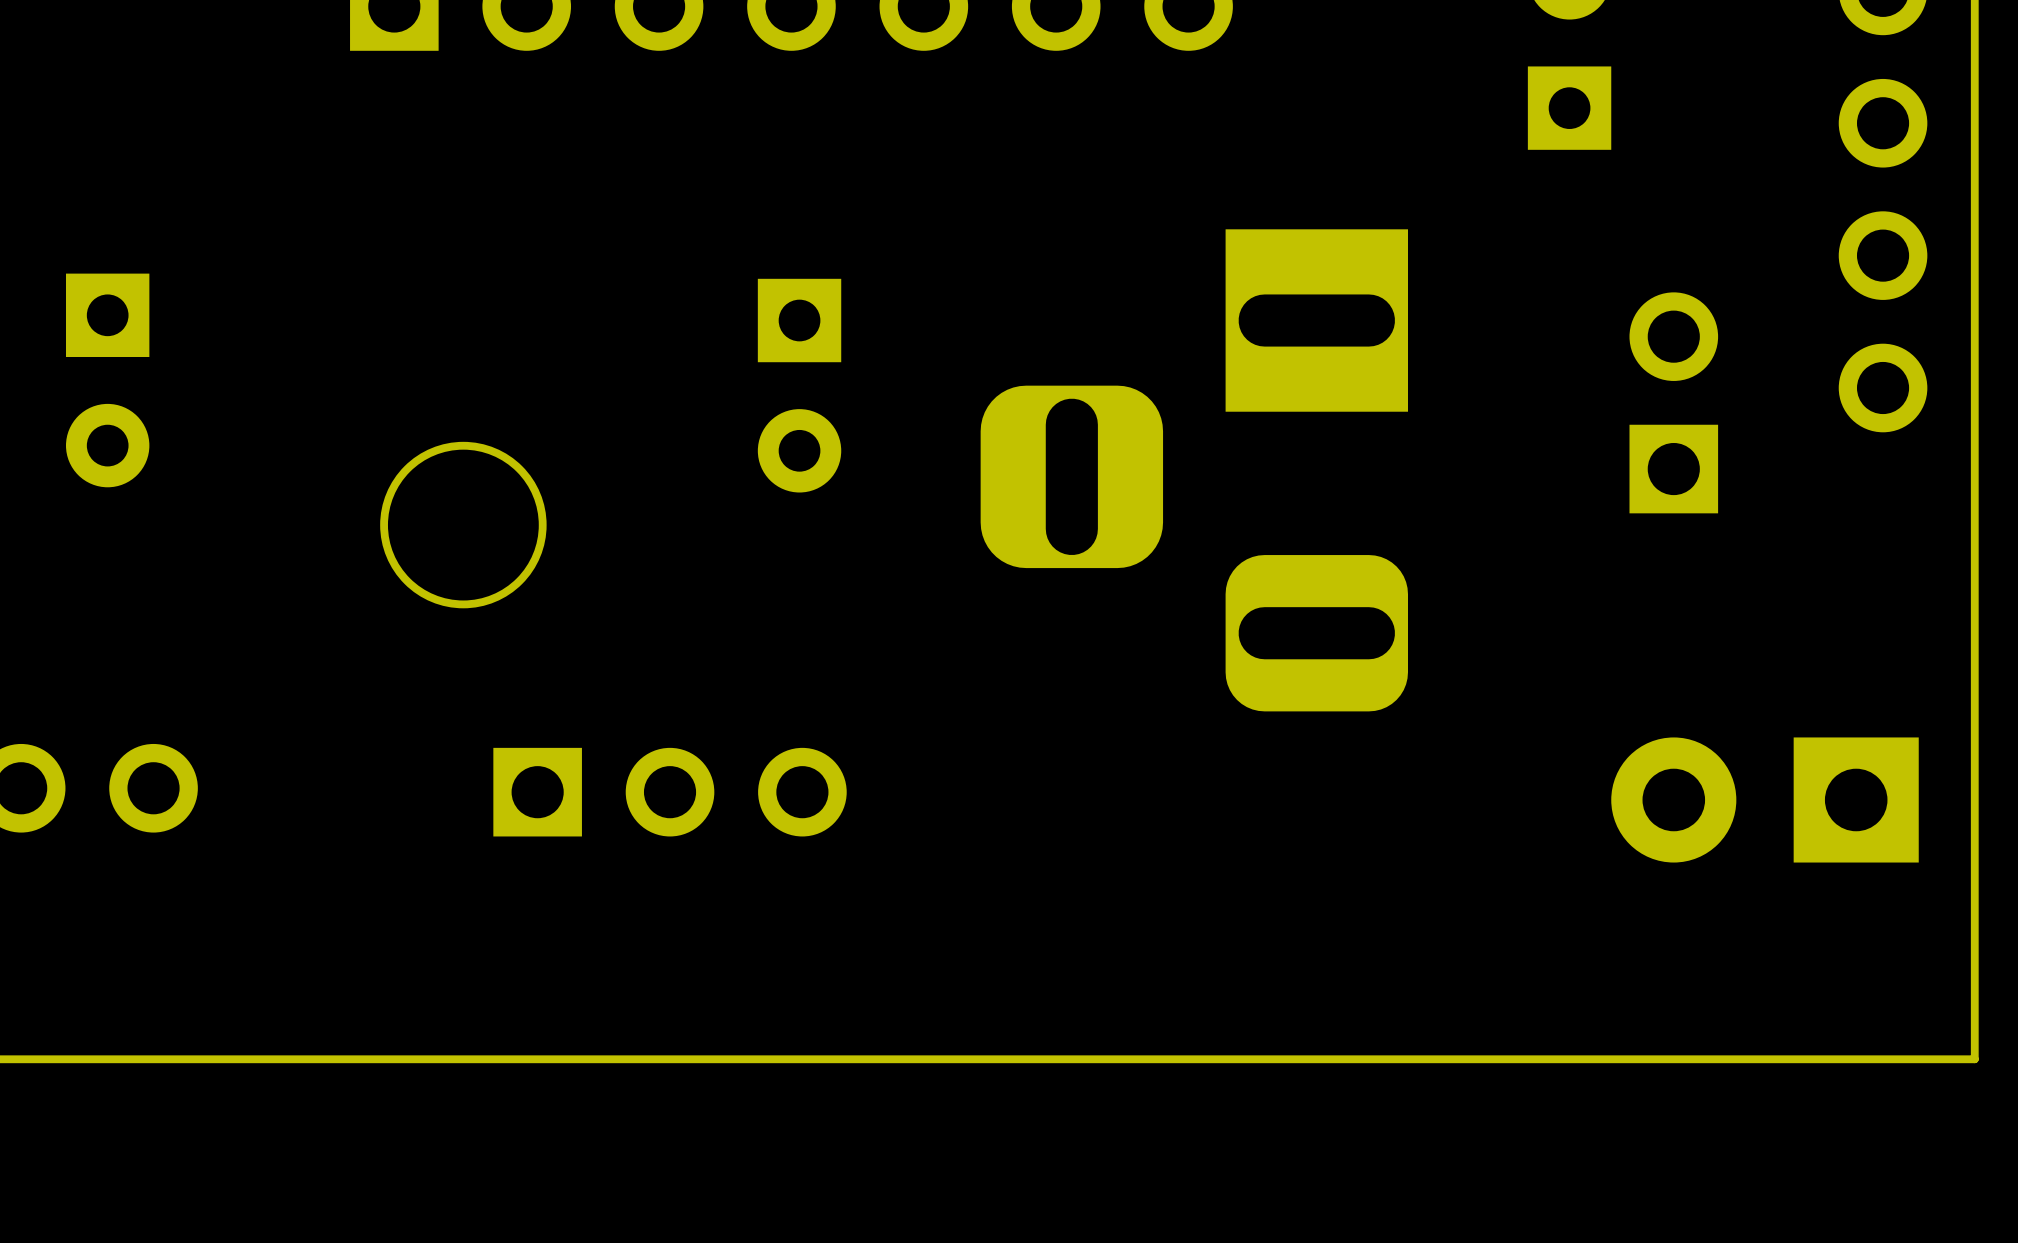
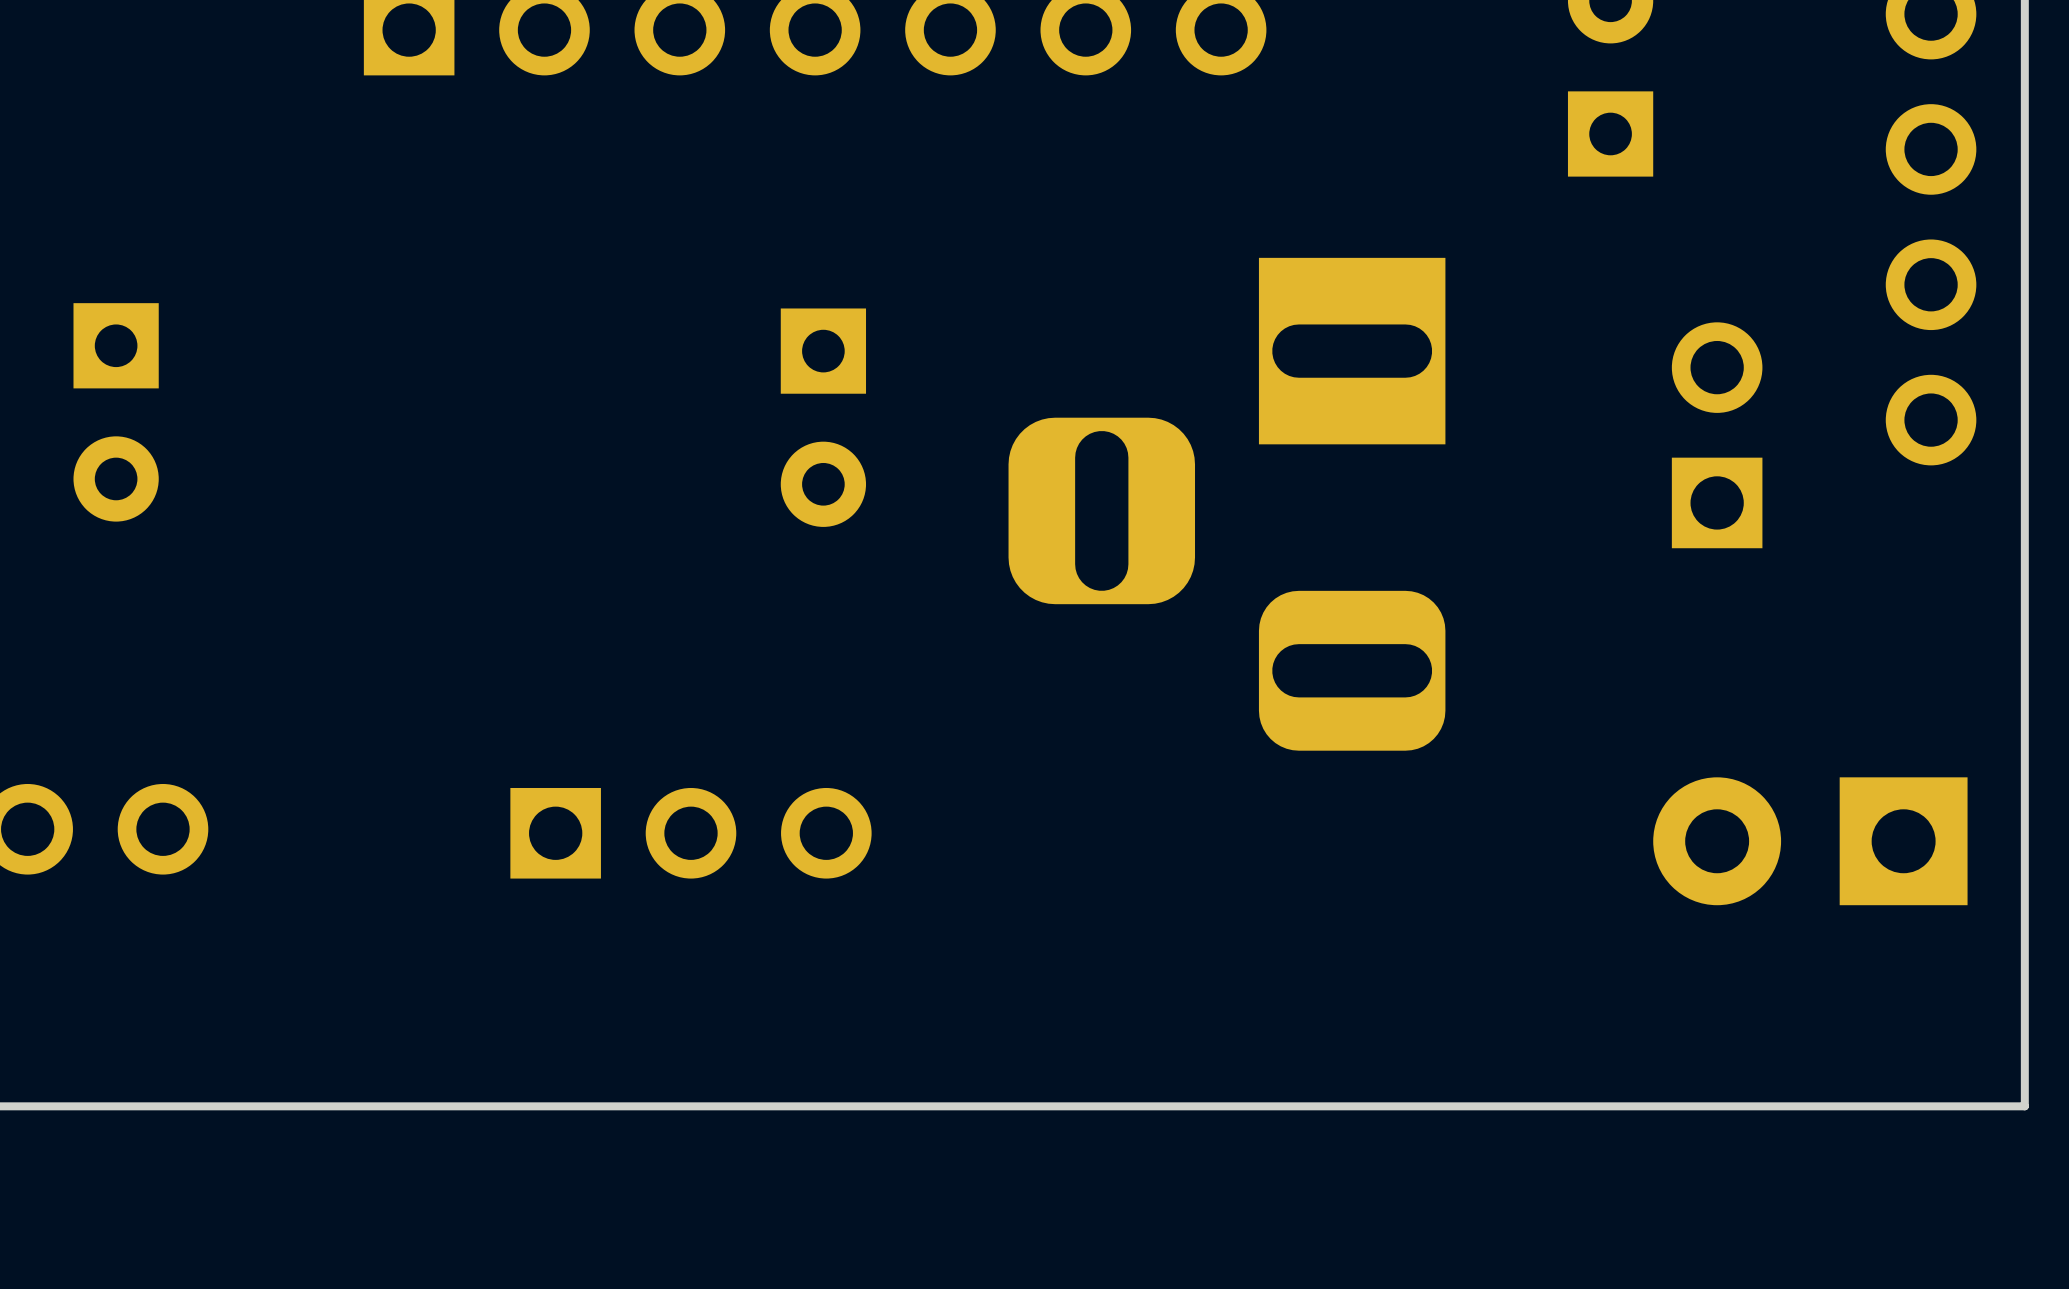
round board edge: [380, 441, 547, 609] -> none

